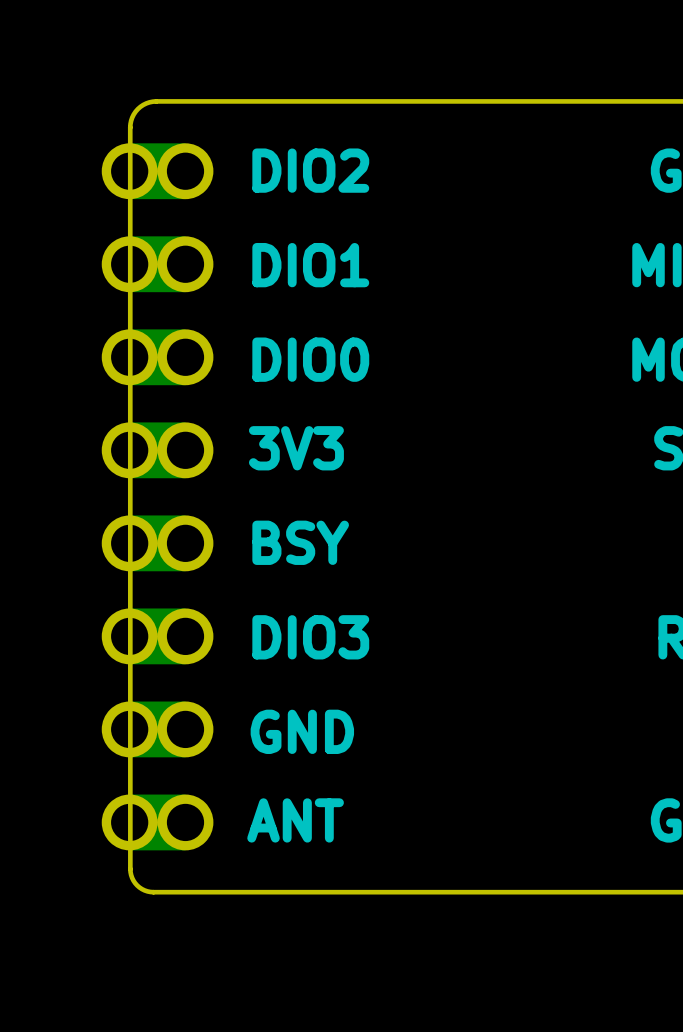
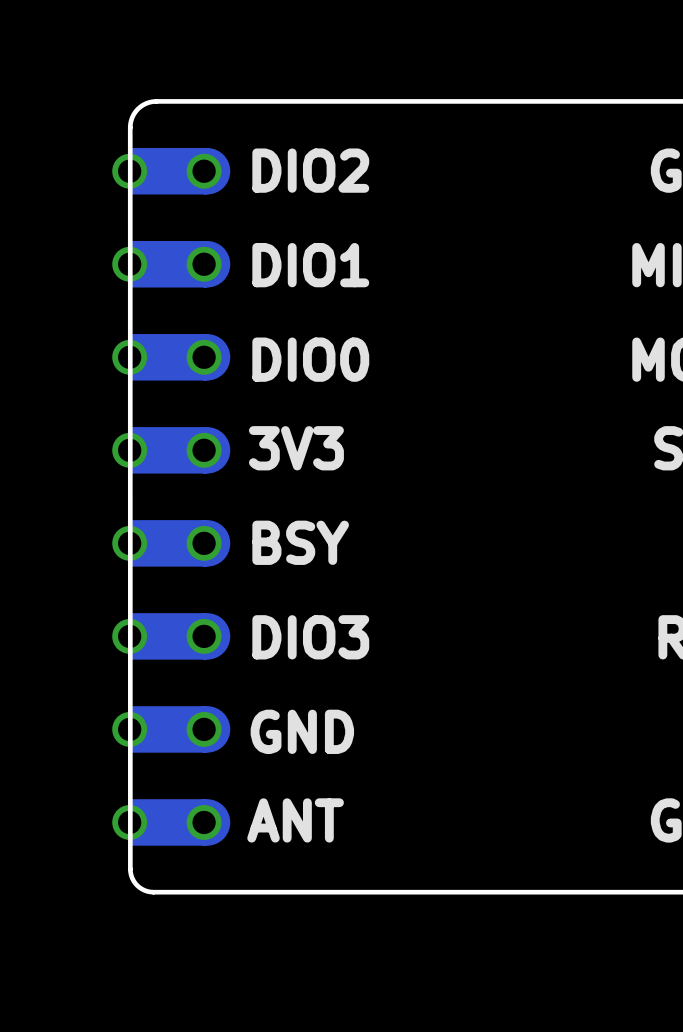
part footprint: [101, 143, 214, 200] -> [112, 147, 231, 195]
part footprint: [101, 236, 214, 293] -> [112, 241, 231, 288]
part footprint: [101, 329, 214, 386] -> [112, 334, 231, 381]
part footprint: [101, 422, 214, 479] -> [112, 427, 231, 474]
part footprint: [101, 515, 214, 572] -> [112, 520, 231, 567]
part footprint: [101, 608, 214, 665] -> [112, 613, 231, 660]
part footprint: [101, 701, 214, 758] -> [112, 706, 231, 753]
part footprint: [101, 794, 214, 851] -> [112, 799, 231, 846]

